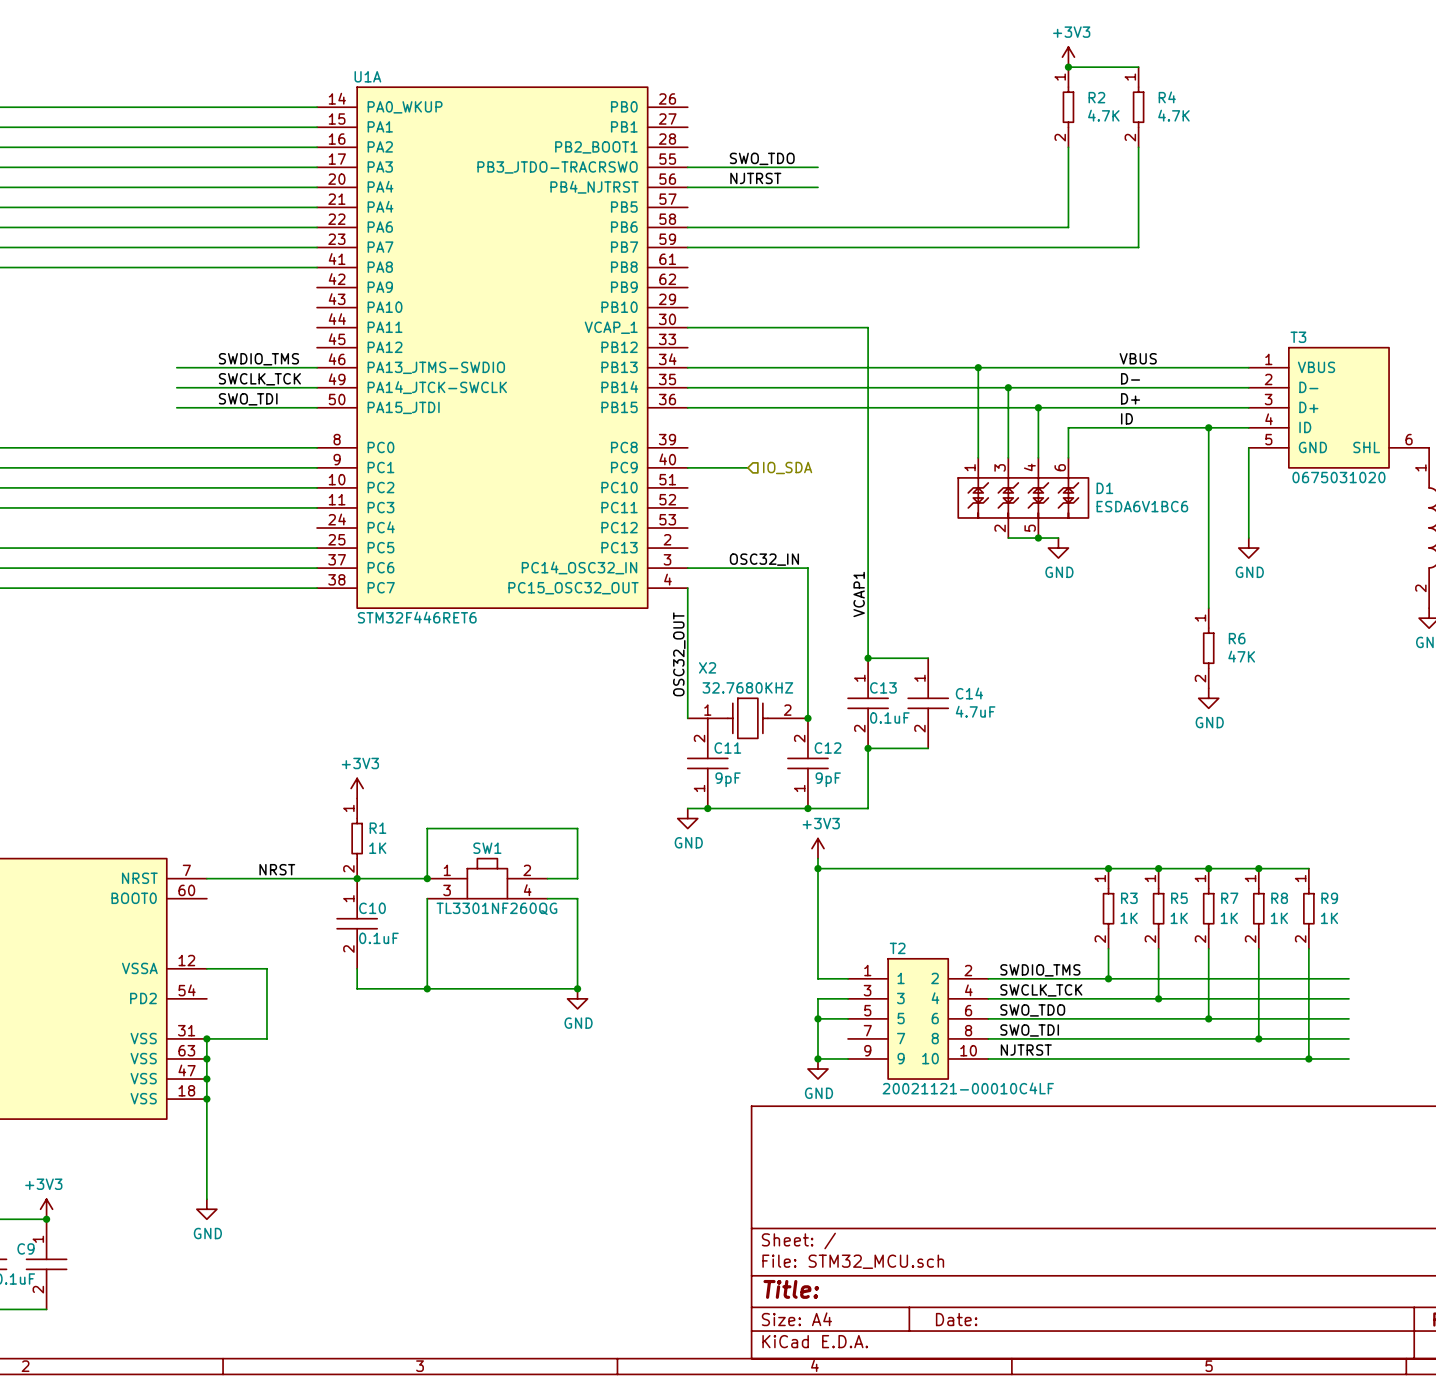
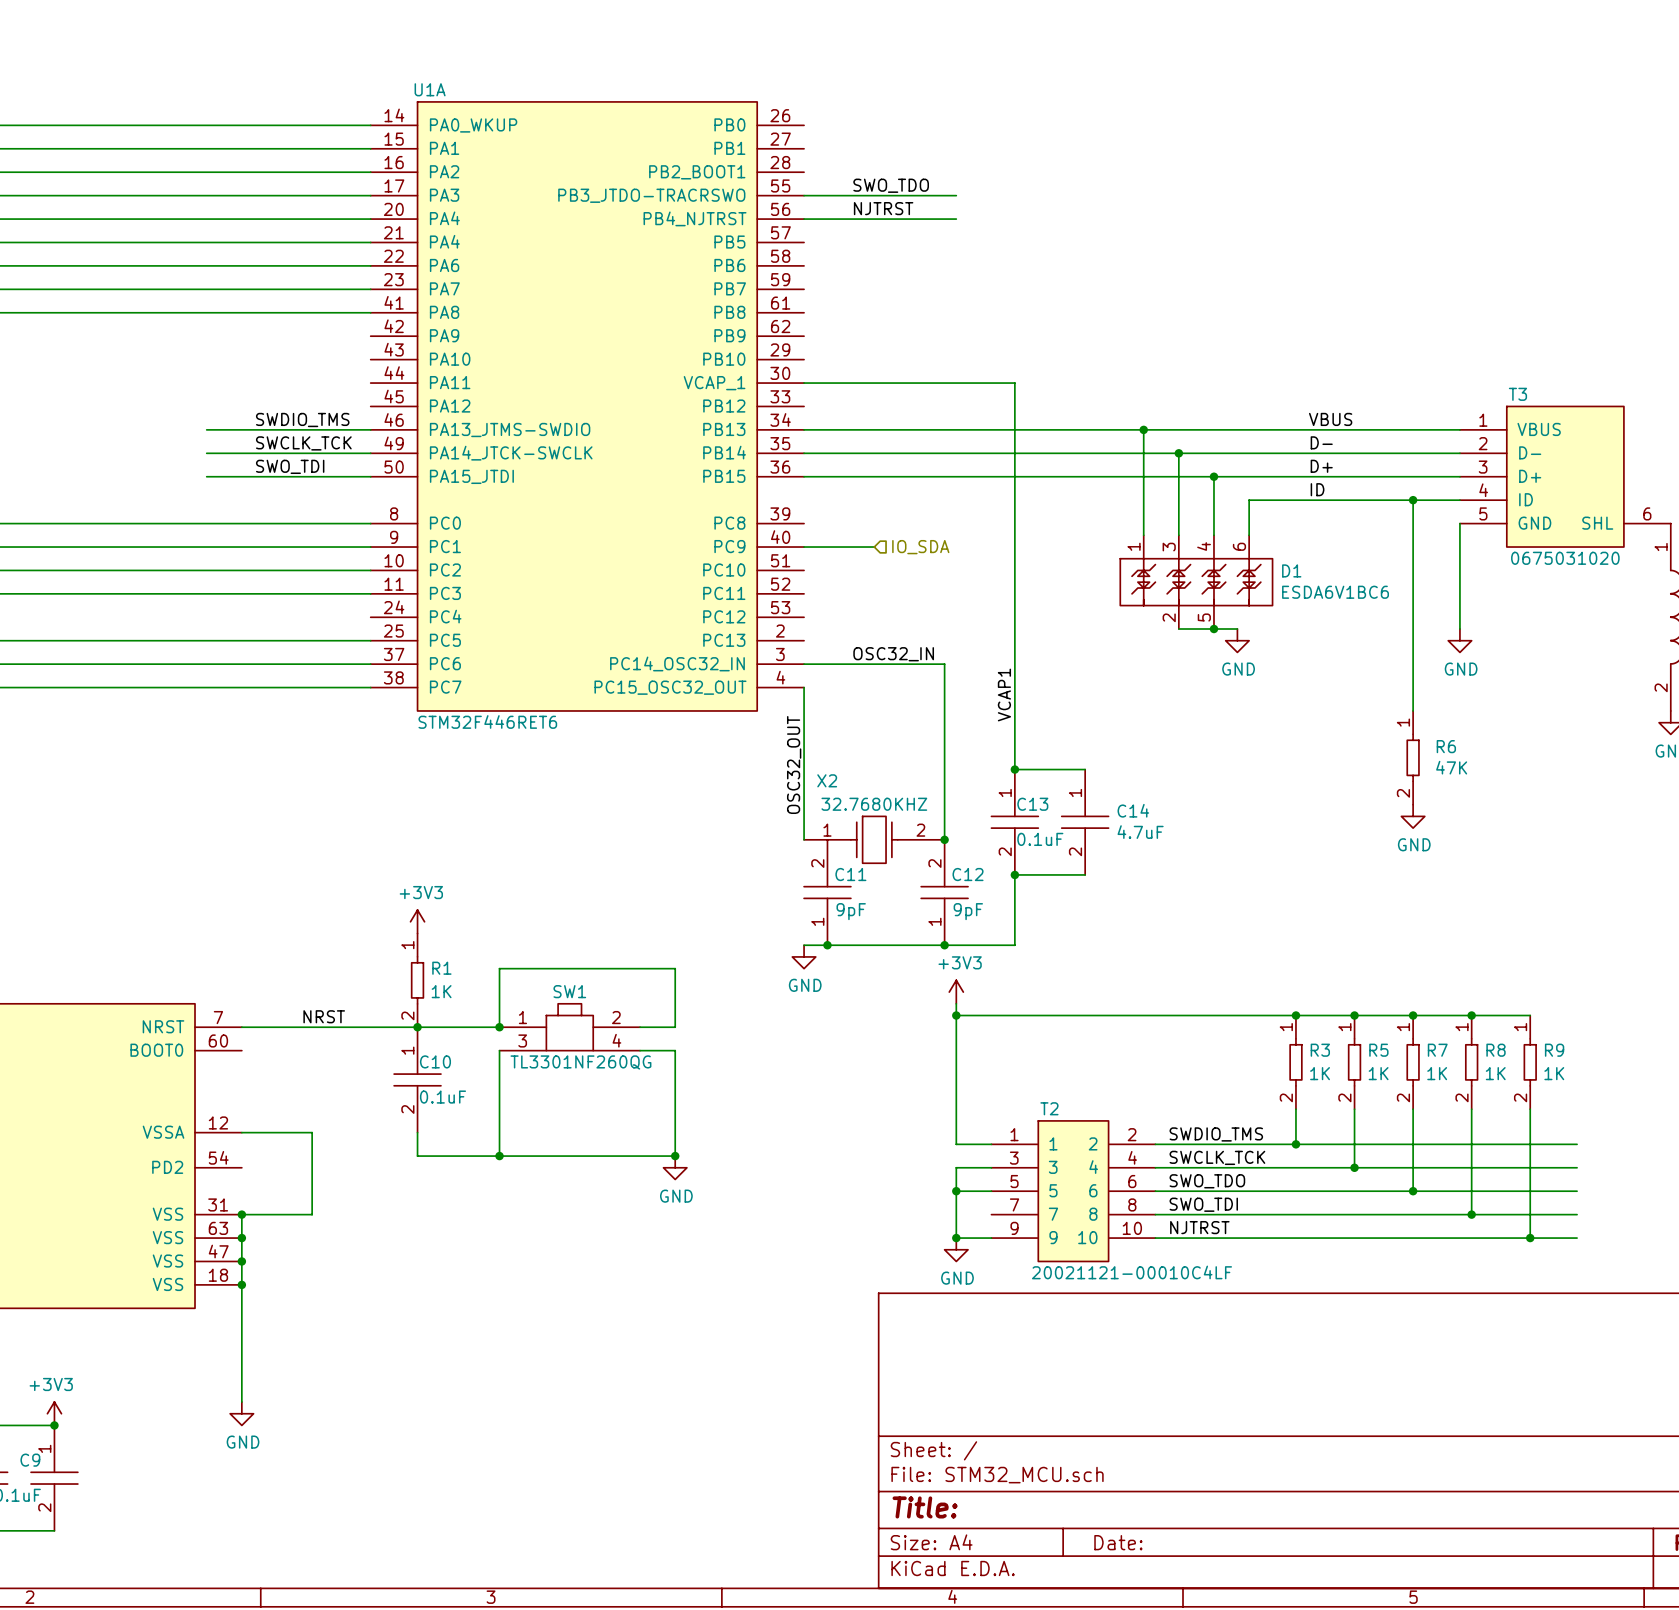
power symbol: +3V3 (1068, 57) -> none
wire: (1068, 67) (1138, 67) -> none
junction: (1068, 67) -> none
R2: (1068, 107) -> none
R4: (1138, 107) -> none
wire: (1068, 147) (1068, 227) (687, 227) -> none
wire: (1138, 147) (1138, 247) (687, 247) -> none

